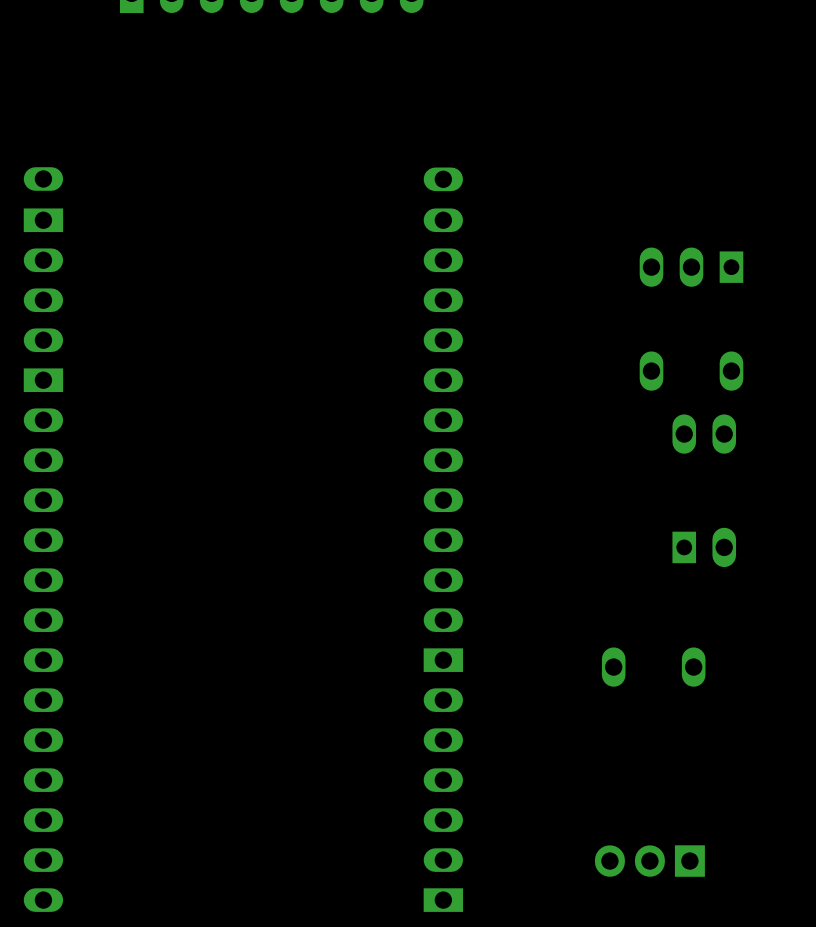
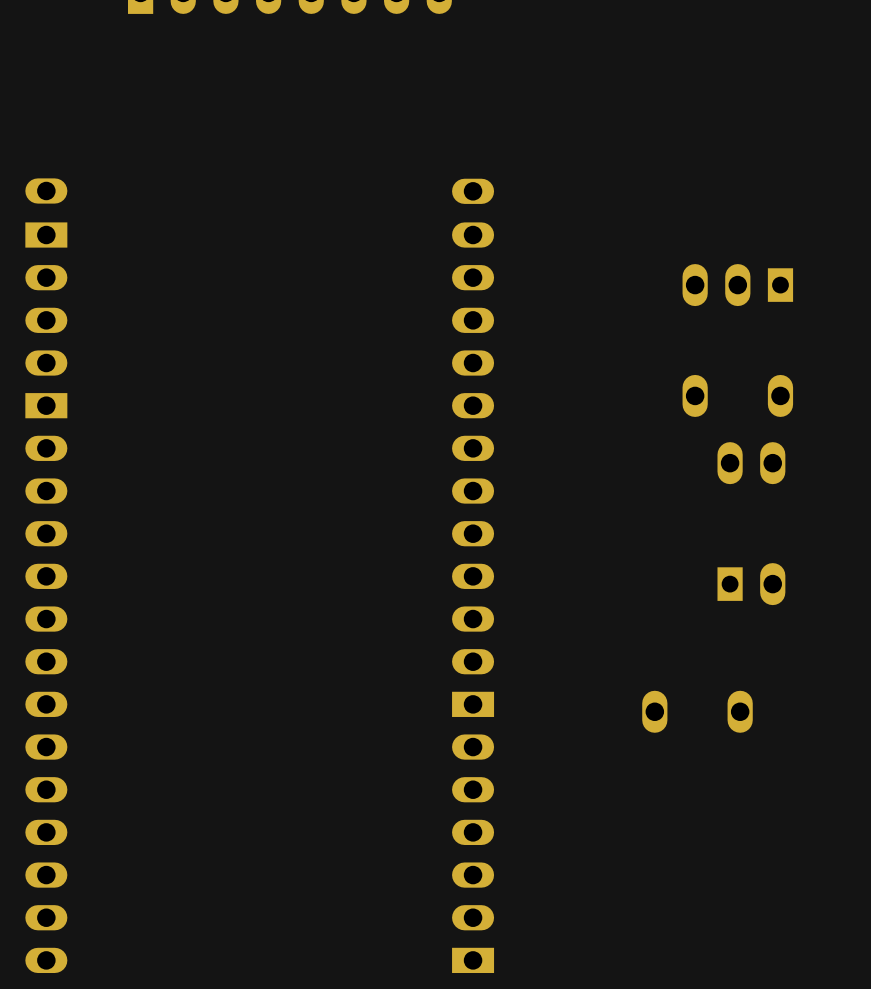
part: (649, 861) -> none

